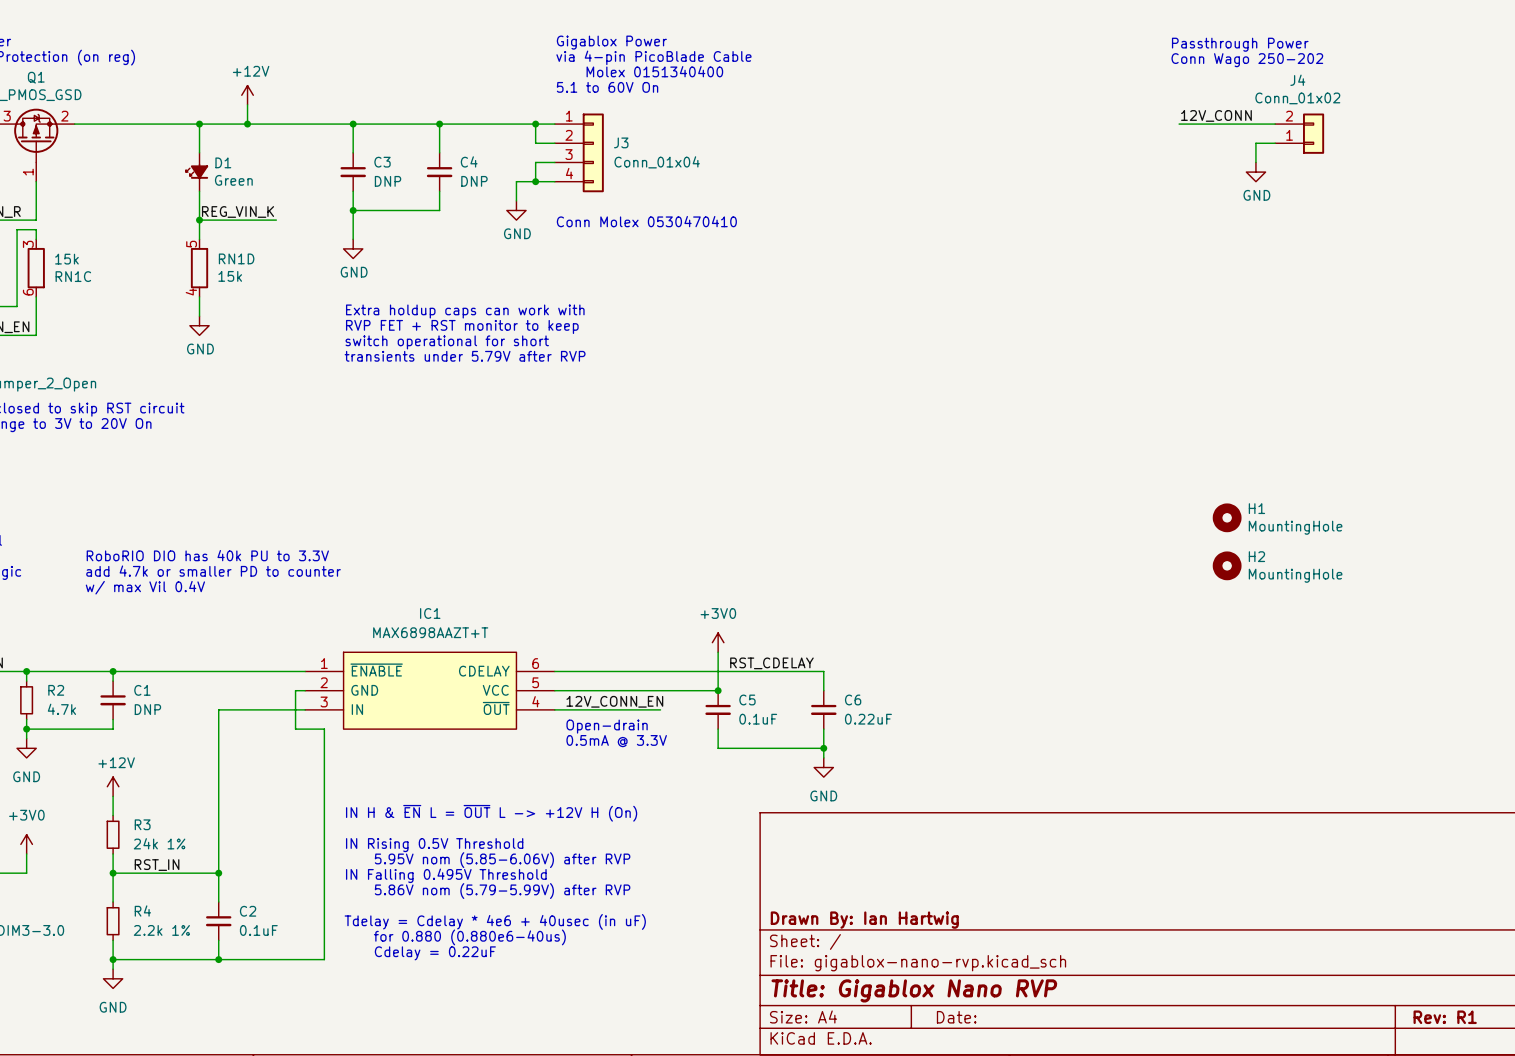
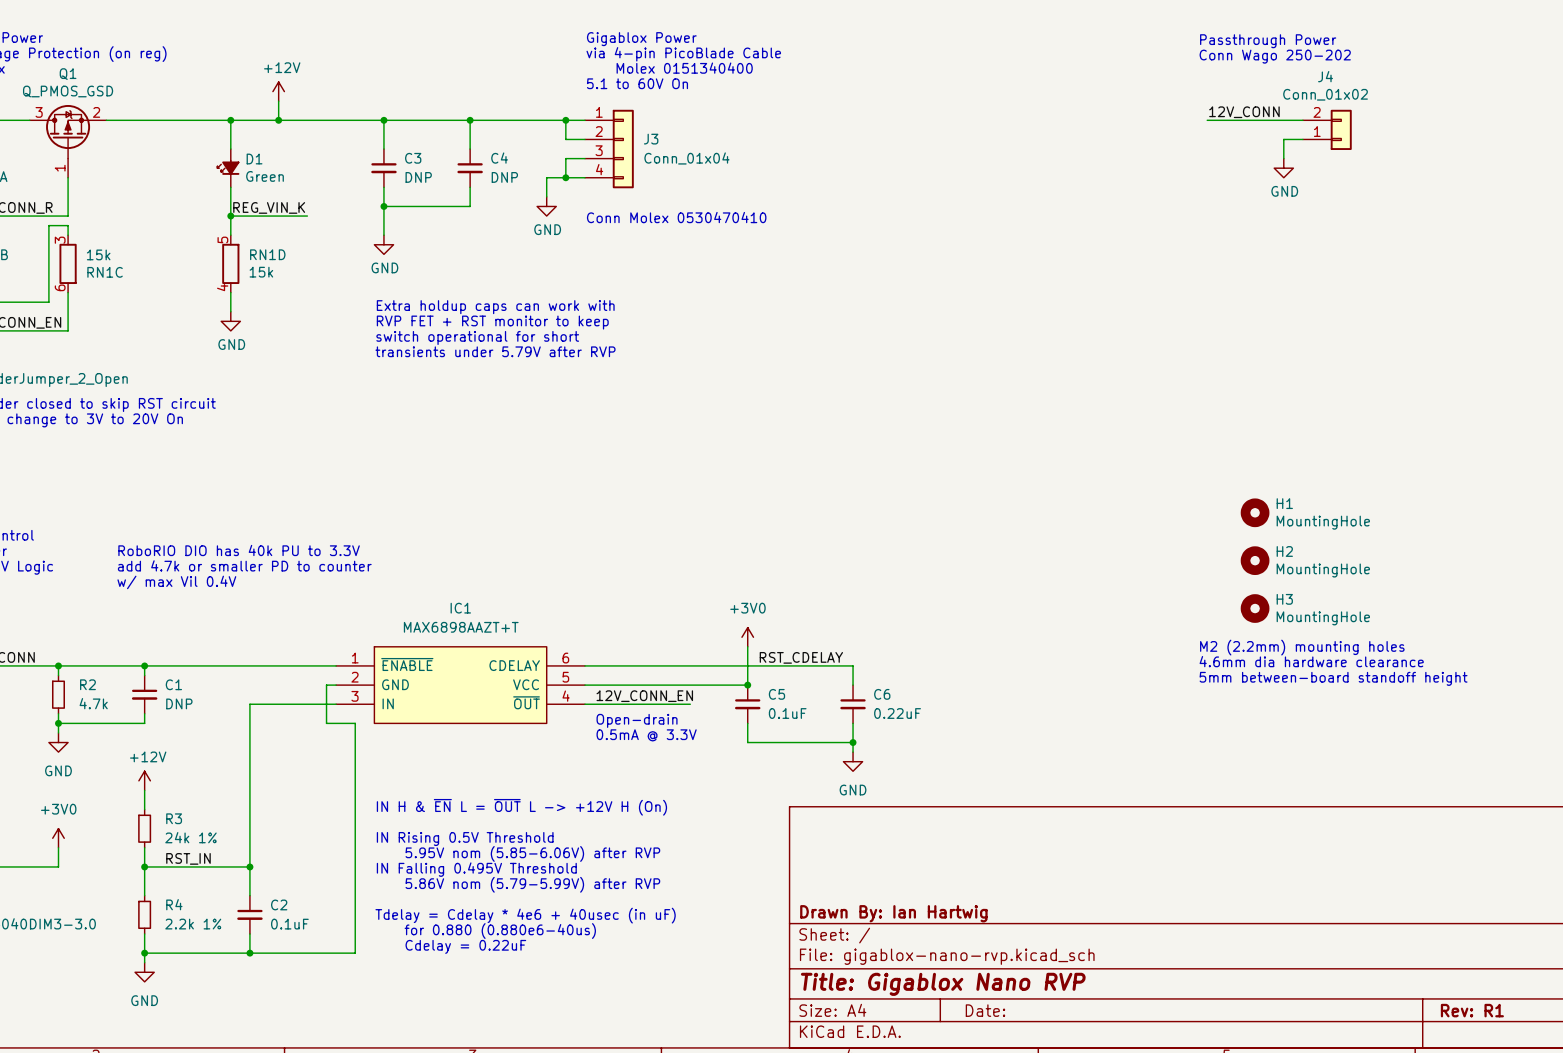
H3: none -> MountingHole (1255, 608)
text: none -> M2 (2.2mm) mounting holes (1302, 647)
text: none -> 4.6mm dia hardware clearance (1311, 661)
text: none -> 5mm between-board standoff height (1333, 678)

